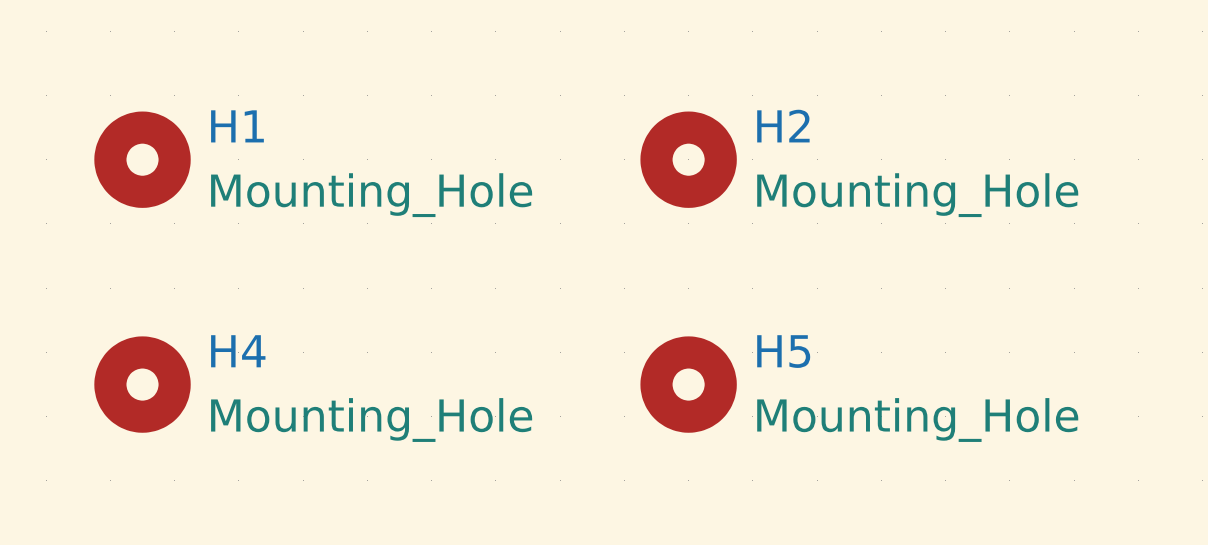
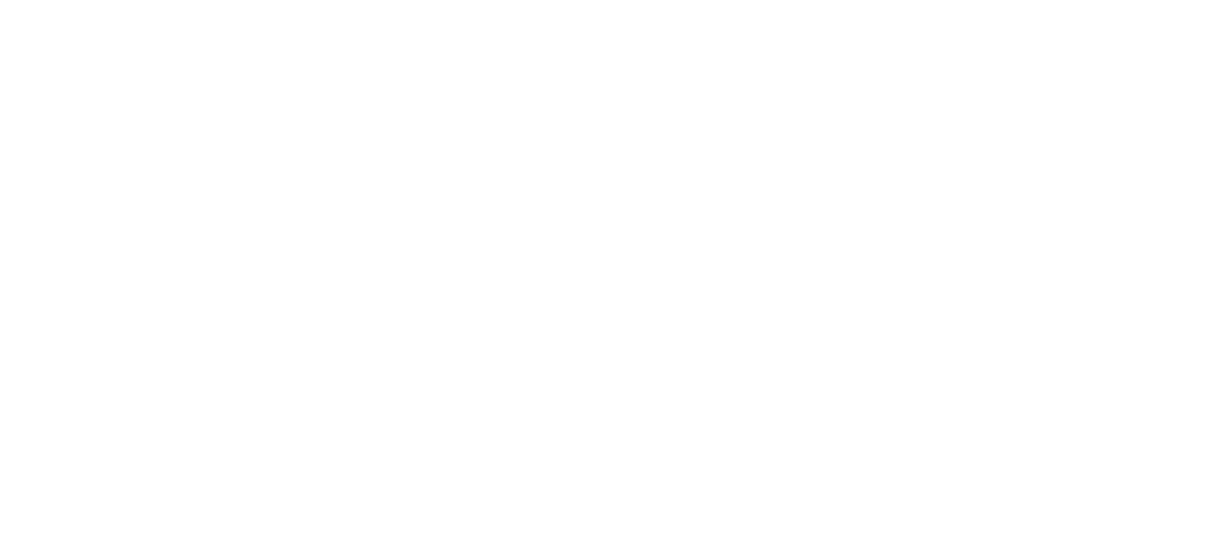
H1: Mounting_Hole (142, 159) -> none
H2: Mounting_Hole (688, 159) -> none
H4: Mounting_Hole (142, 384) -> none
H5: Mounting_Hole (688, 384) -> none

